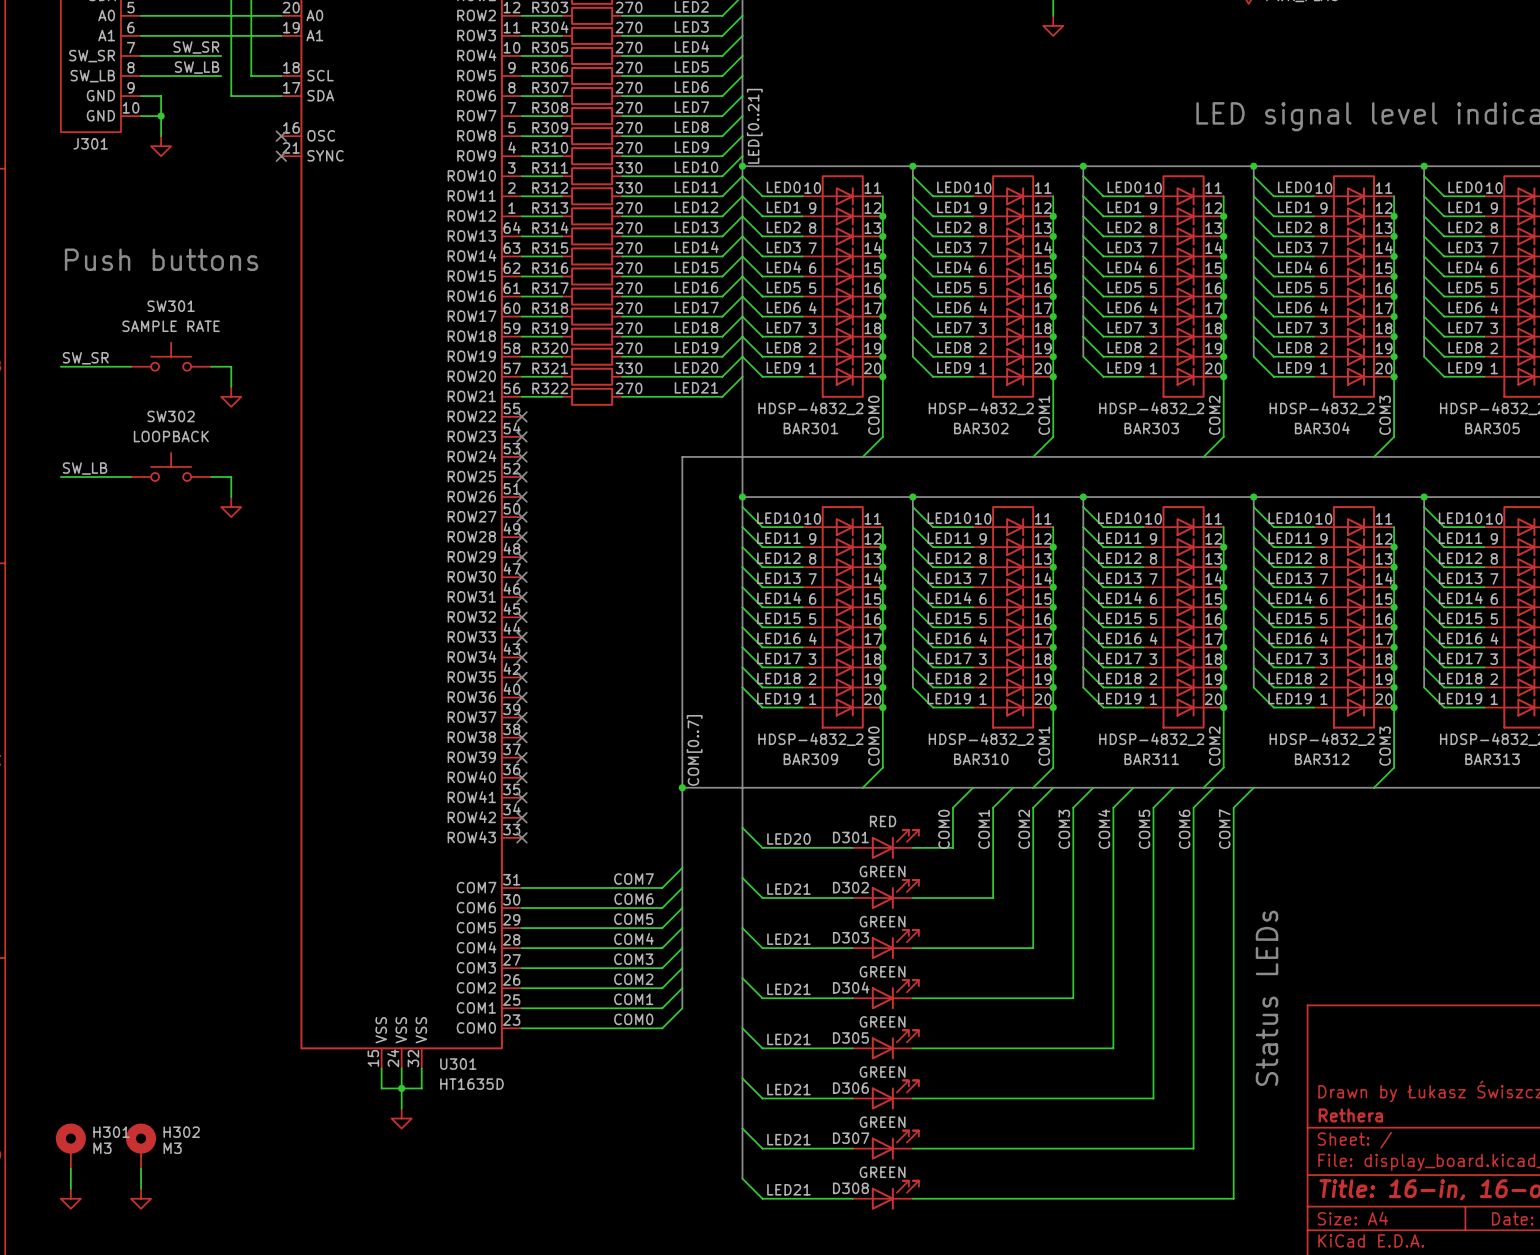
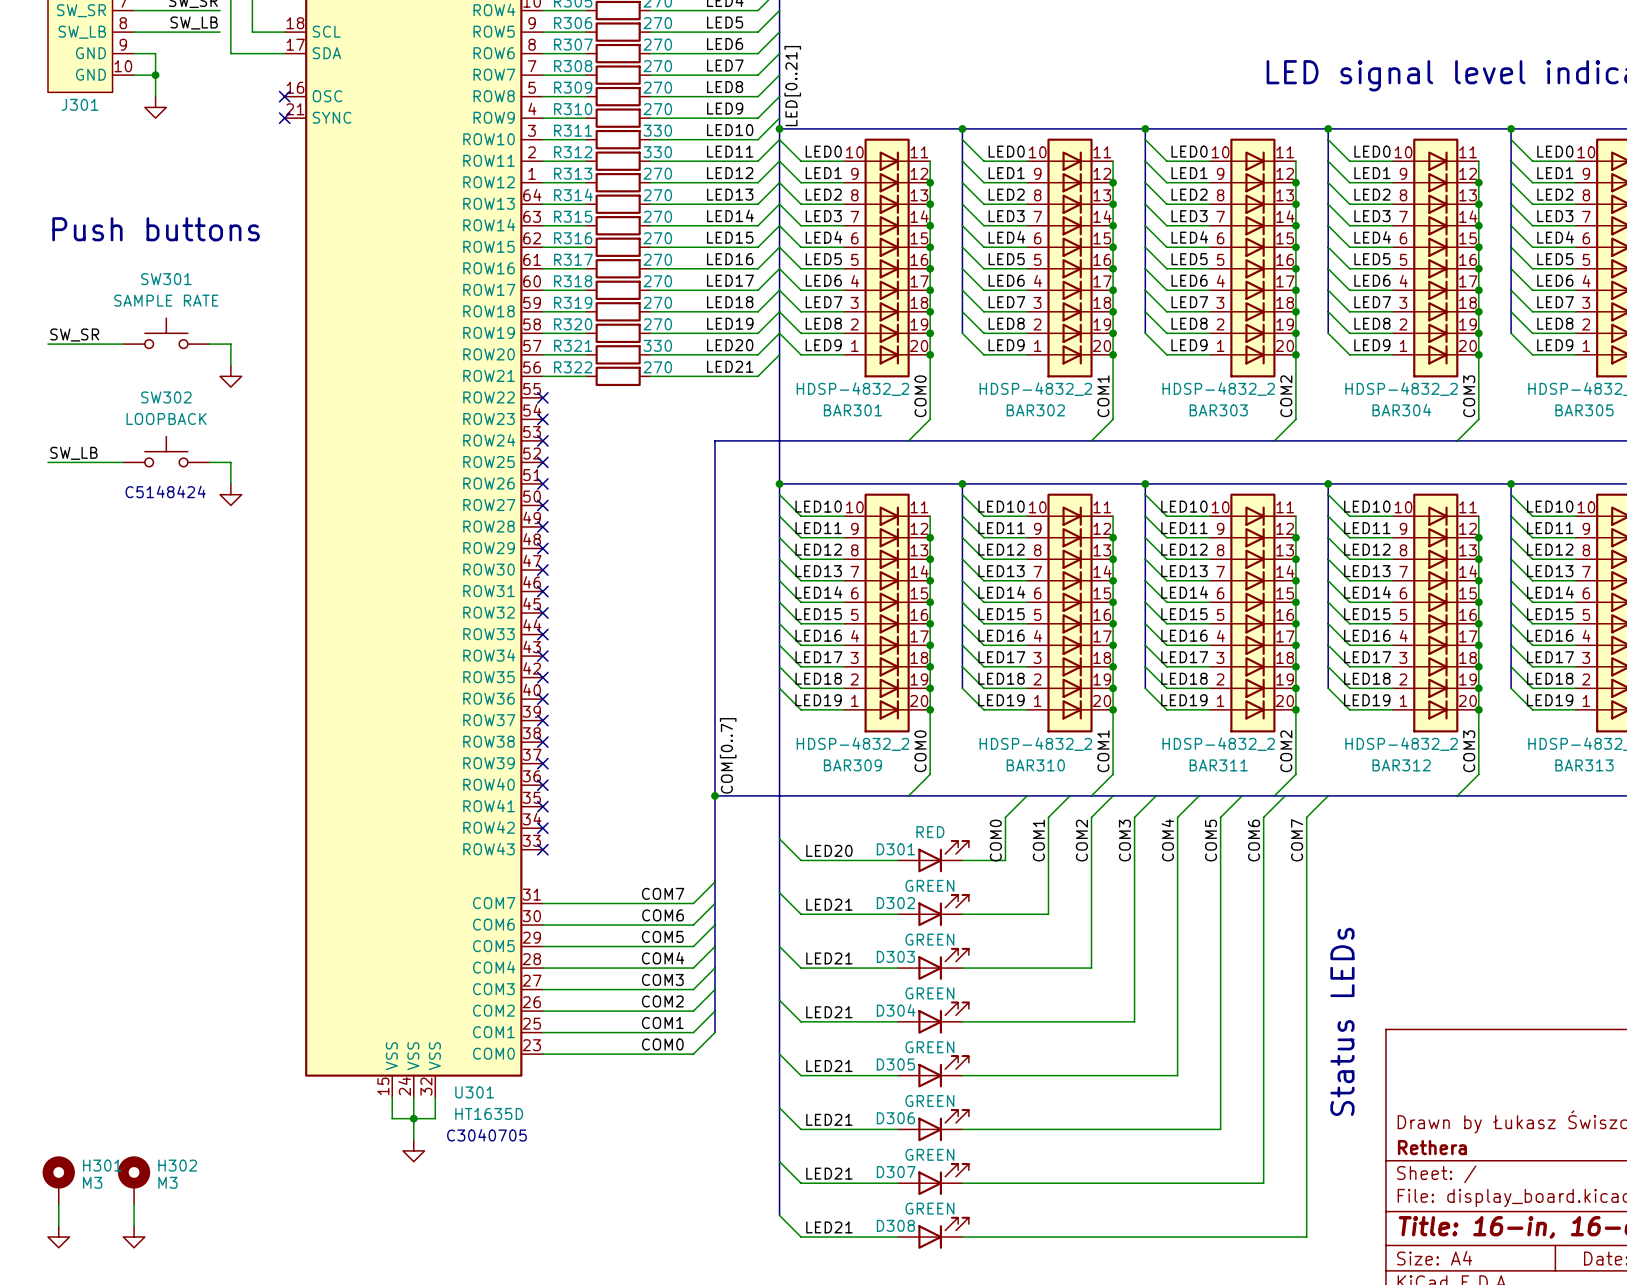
text: none -> C5148424 (165, 491)
text: none -> C3040705 (486, 1135)

